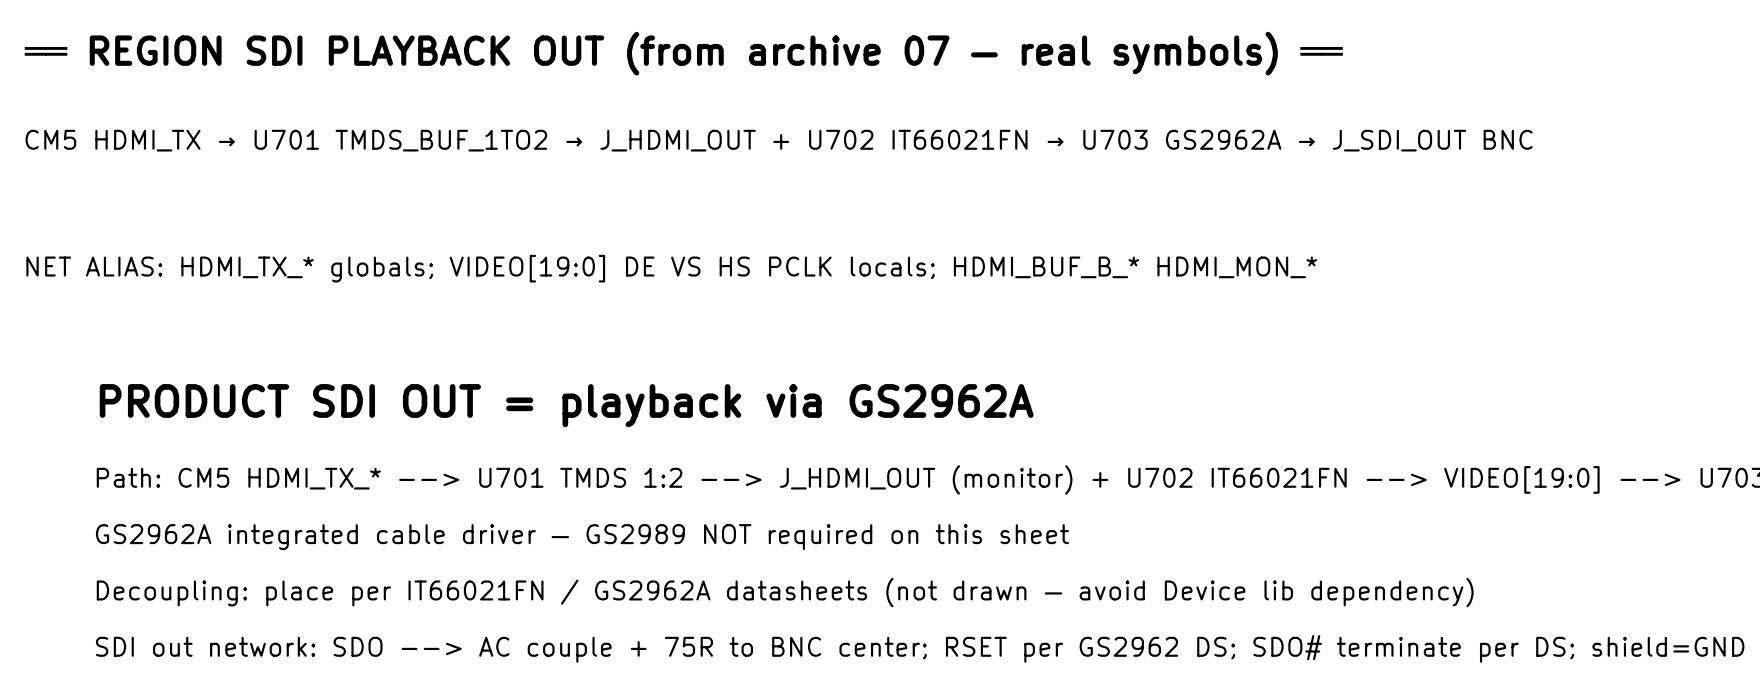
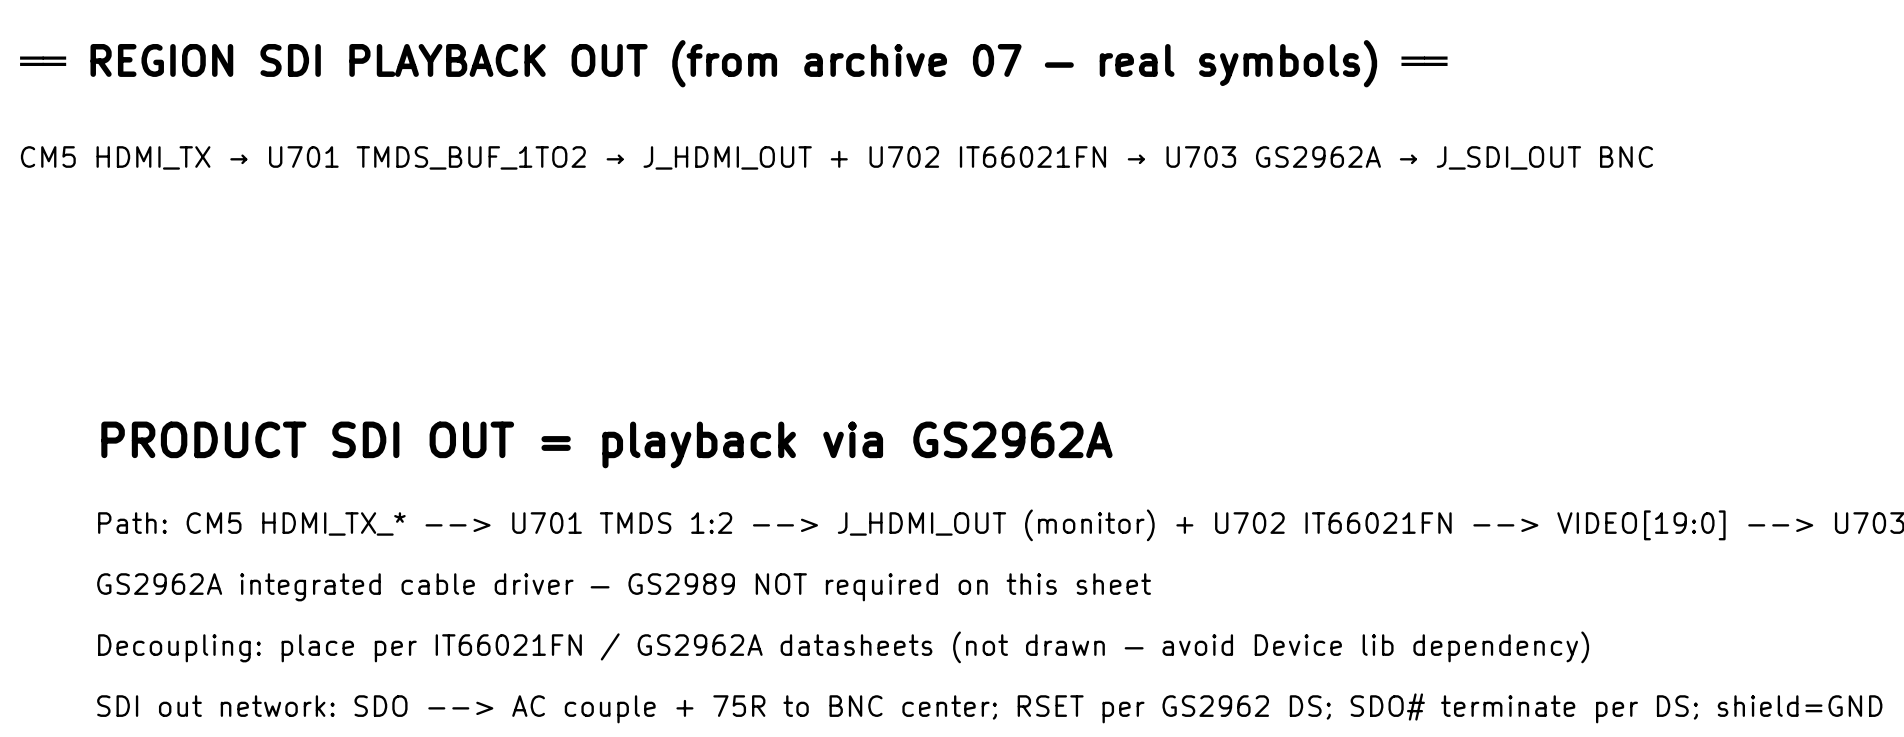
text: NET ALIAS: HDMI_TX_* globals; VIDEO[19:0] DE VS HS PCLK locals; HDMI_BUF_B_* HDMI_MON_* (671, 268) -> none

